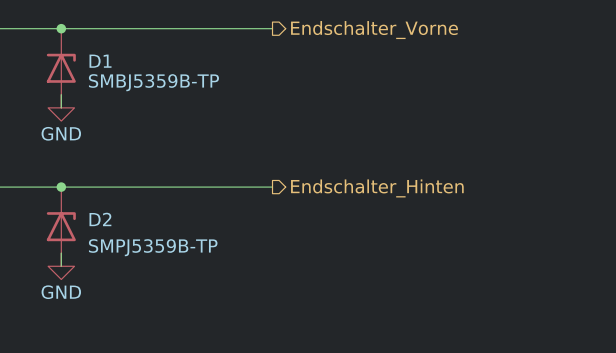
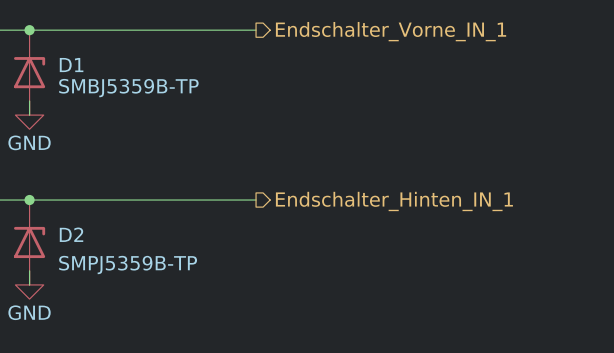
hierarchical label: Endschalter_Vorne (374, 30) -> Endschalter_Vorne_IN_1 (391, 31)
hierarchical label: Endschalter_Hinten (377, 188) -> Endschalter_Hinten_IN_1 (394, 201)

